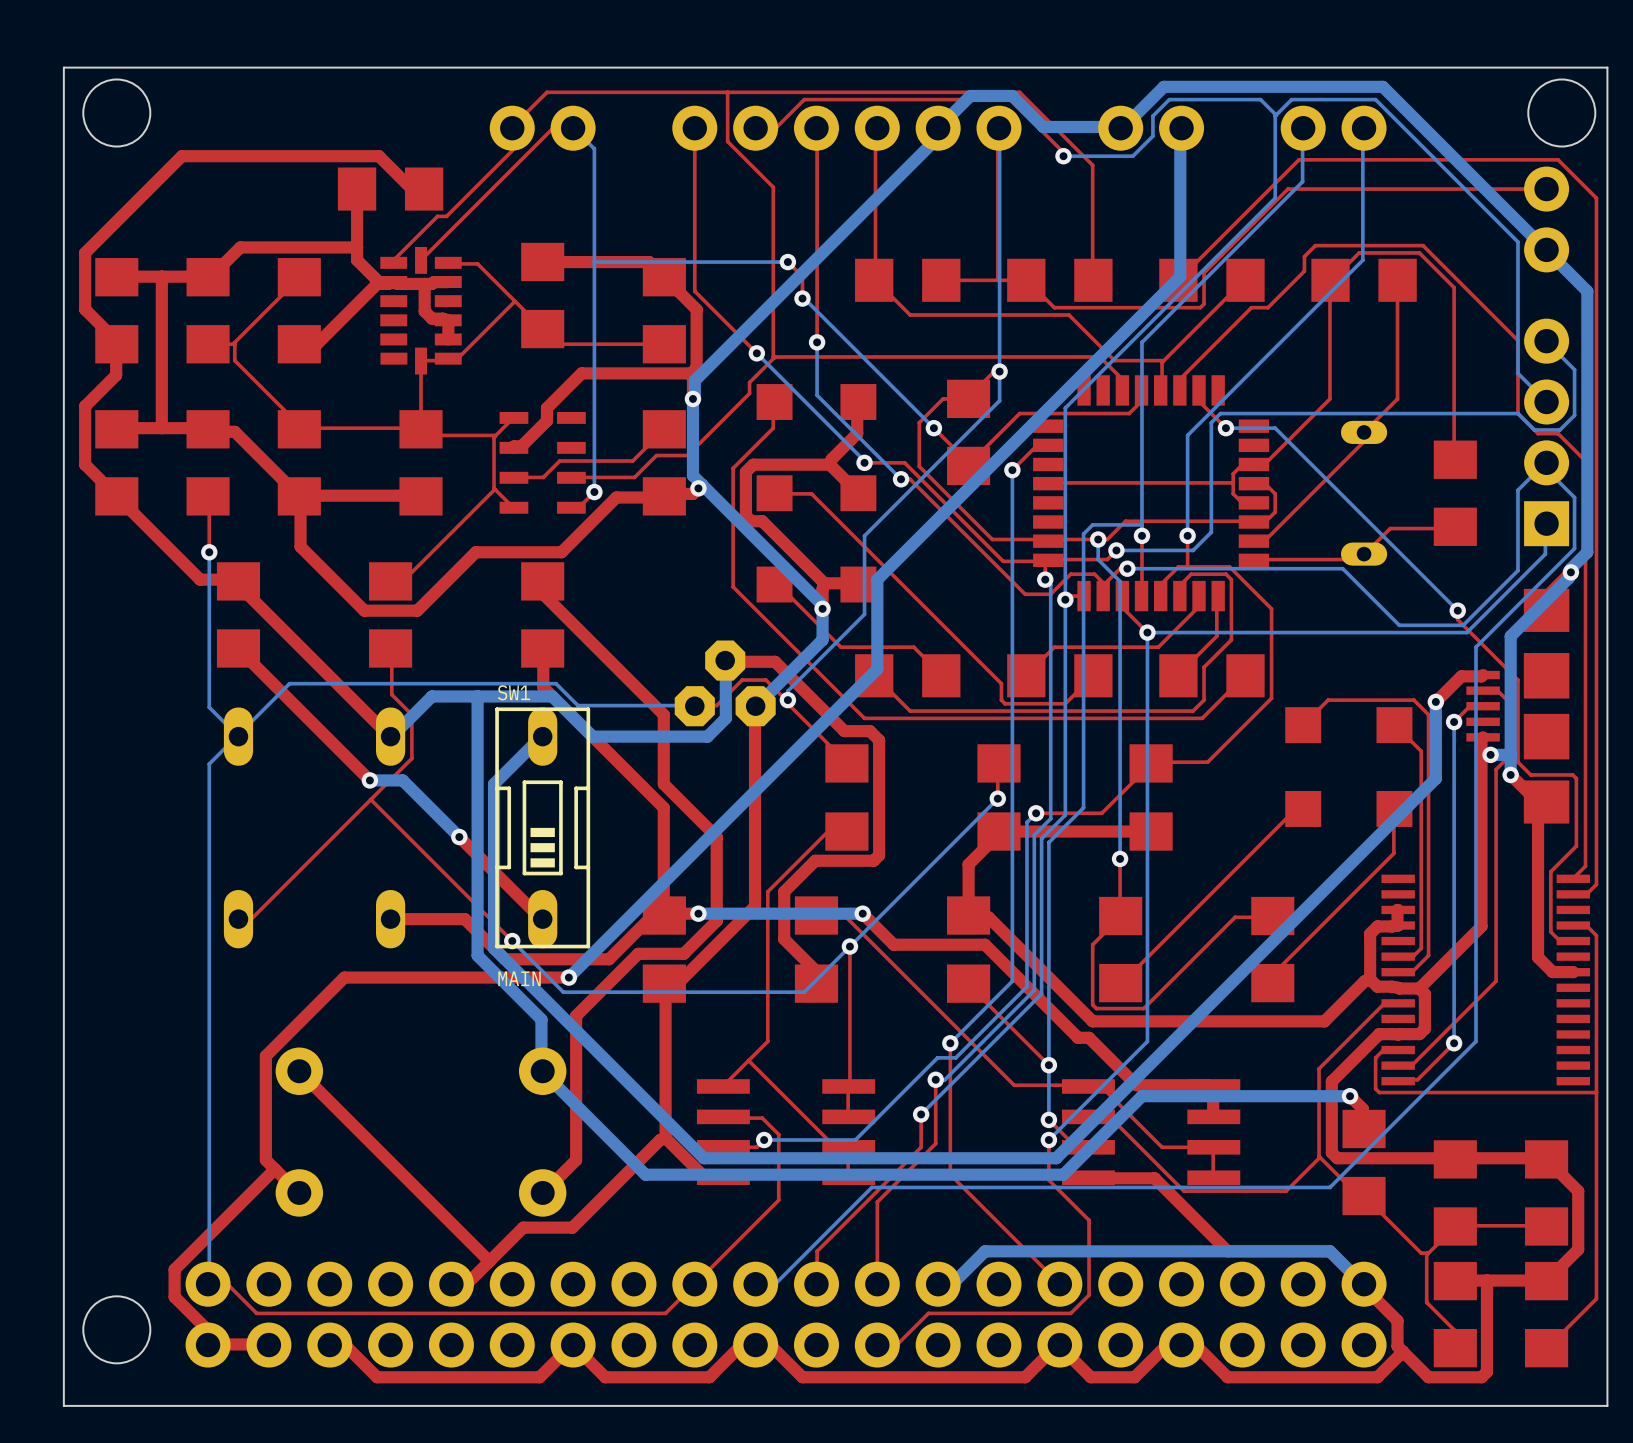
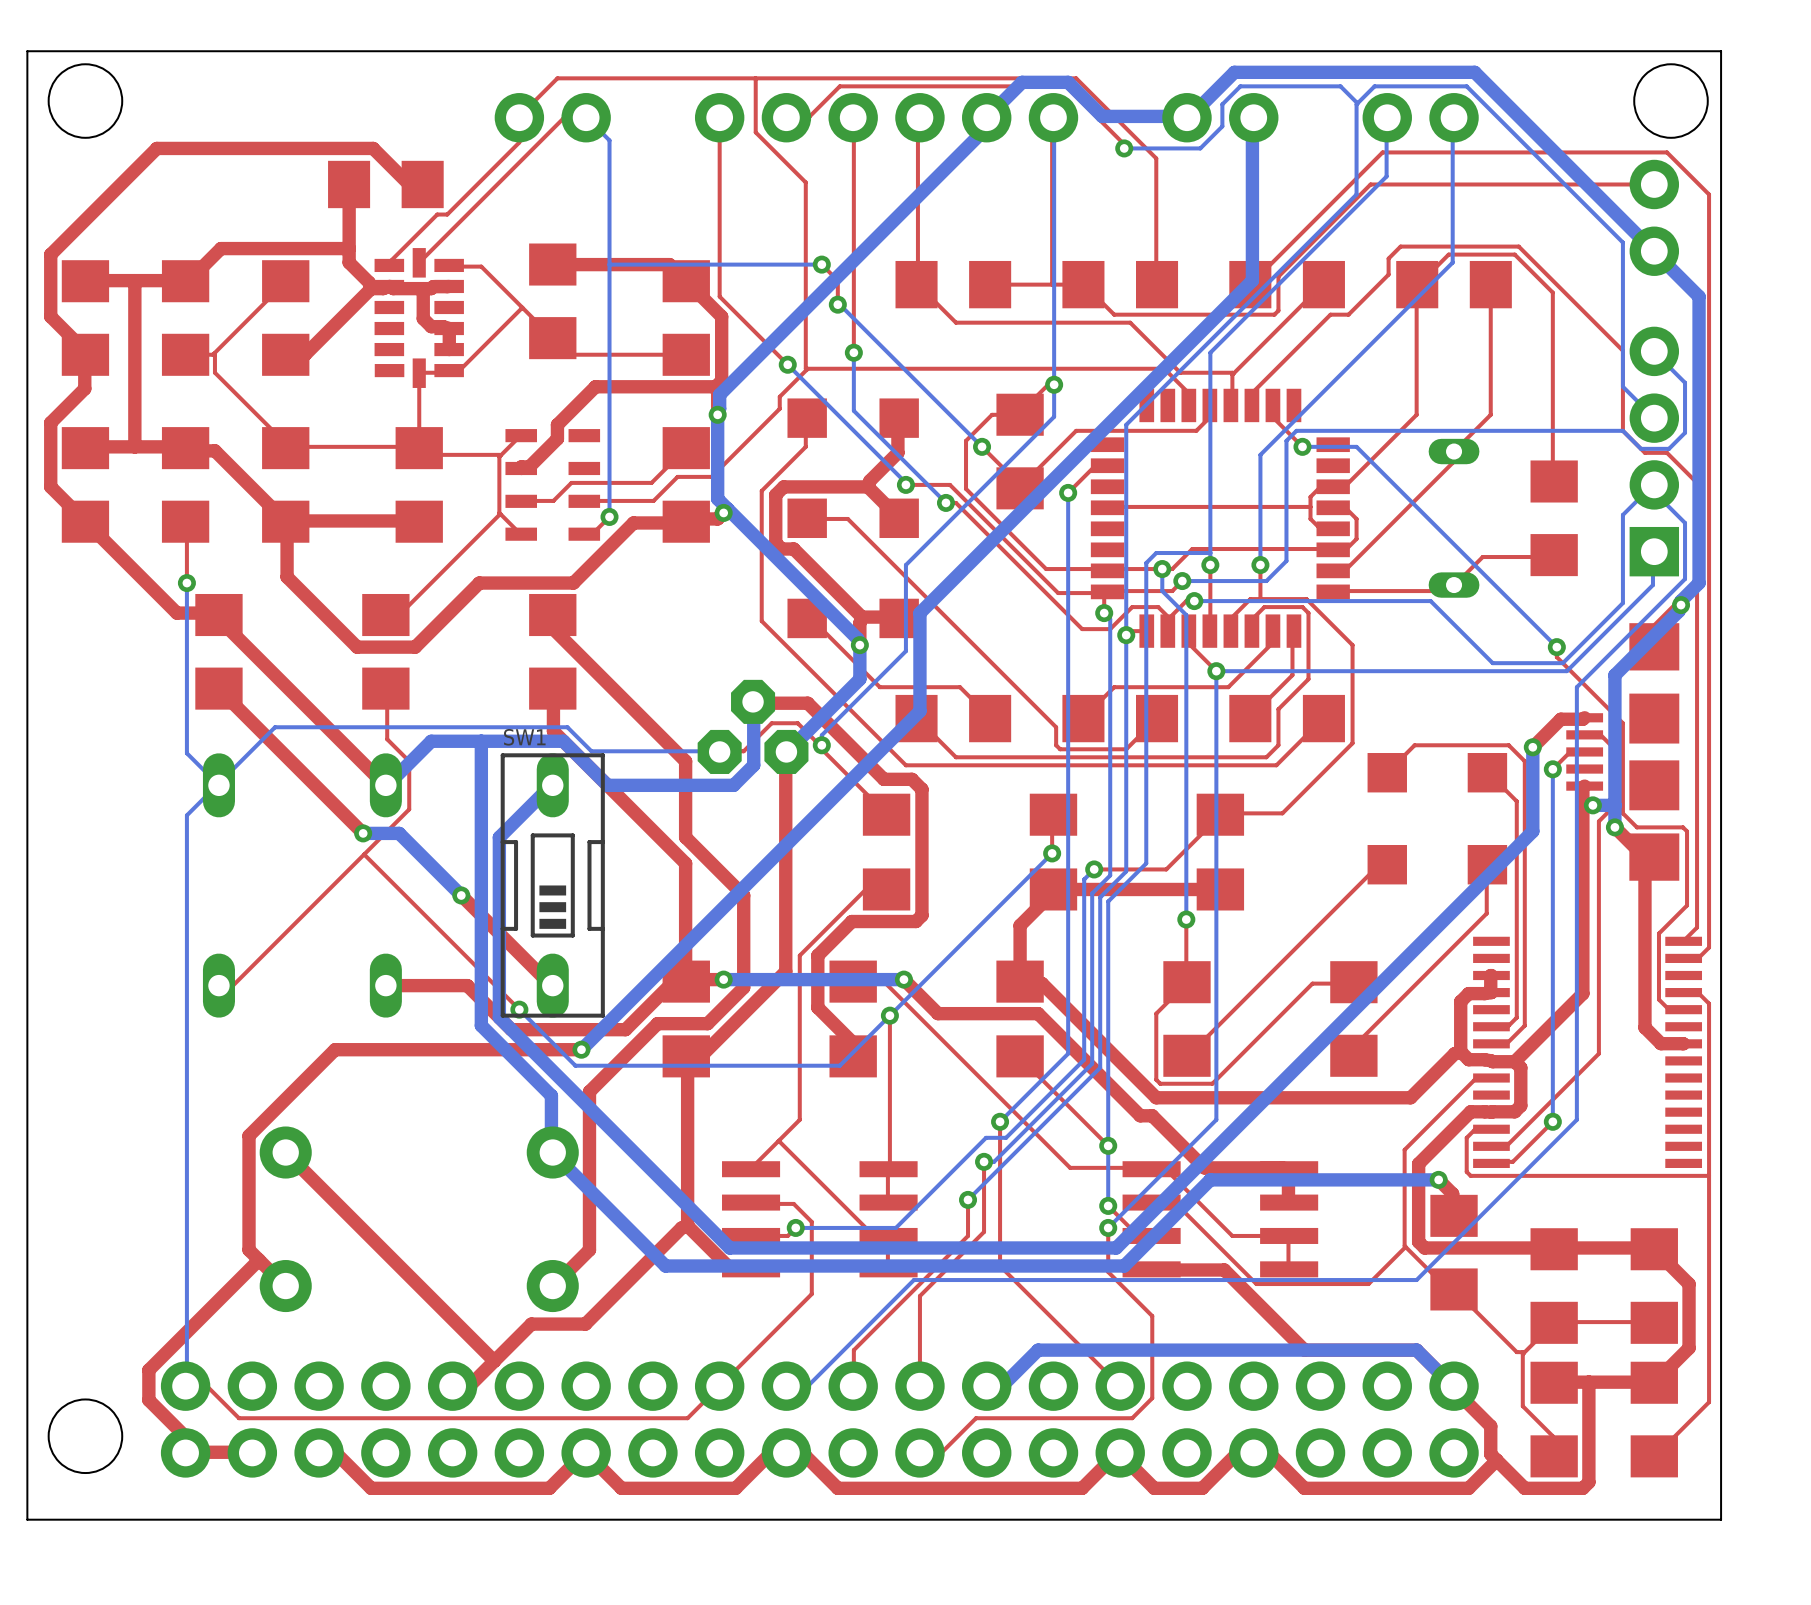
SW1 value: MAIN (519, 978) -> none

